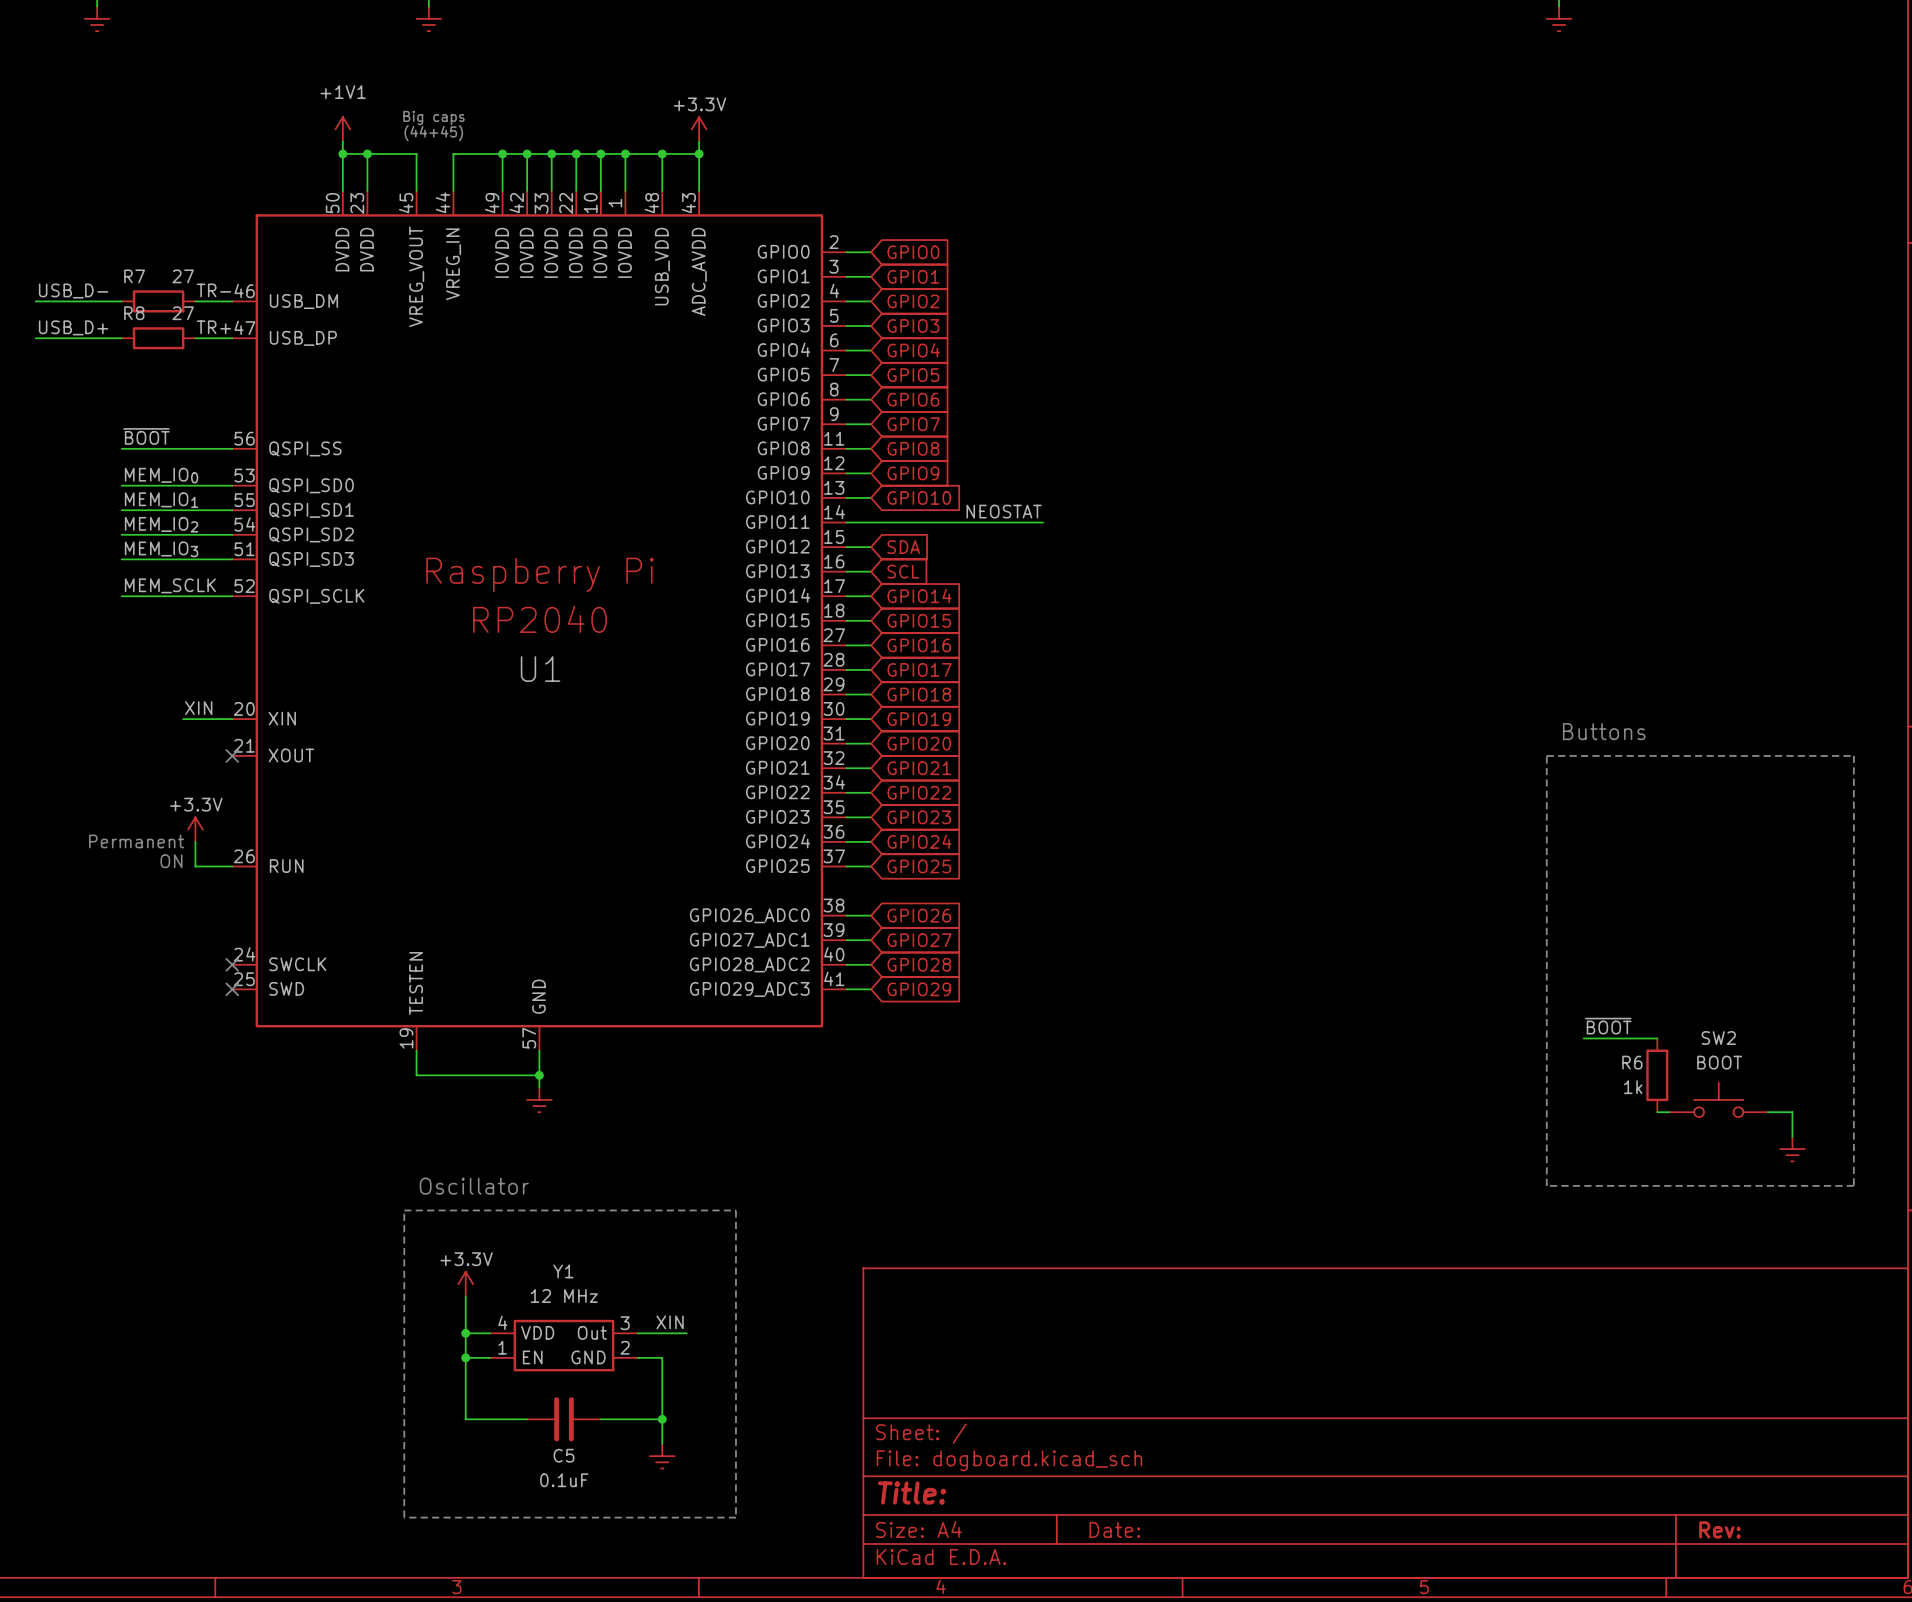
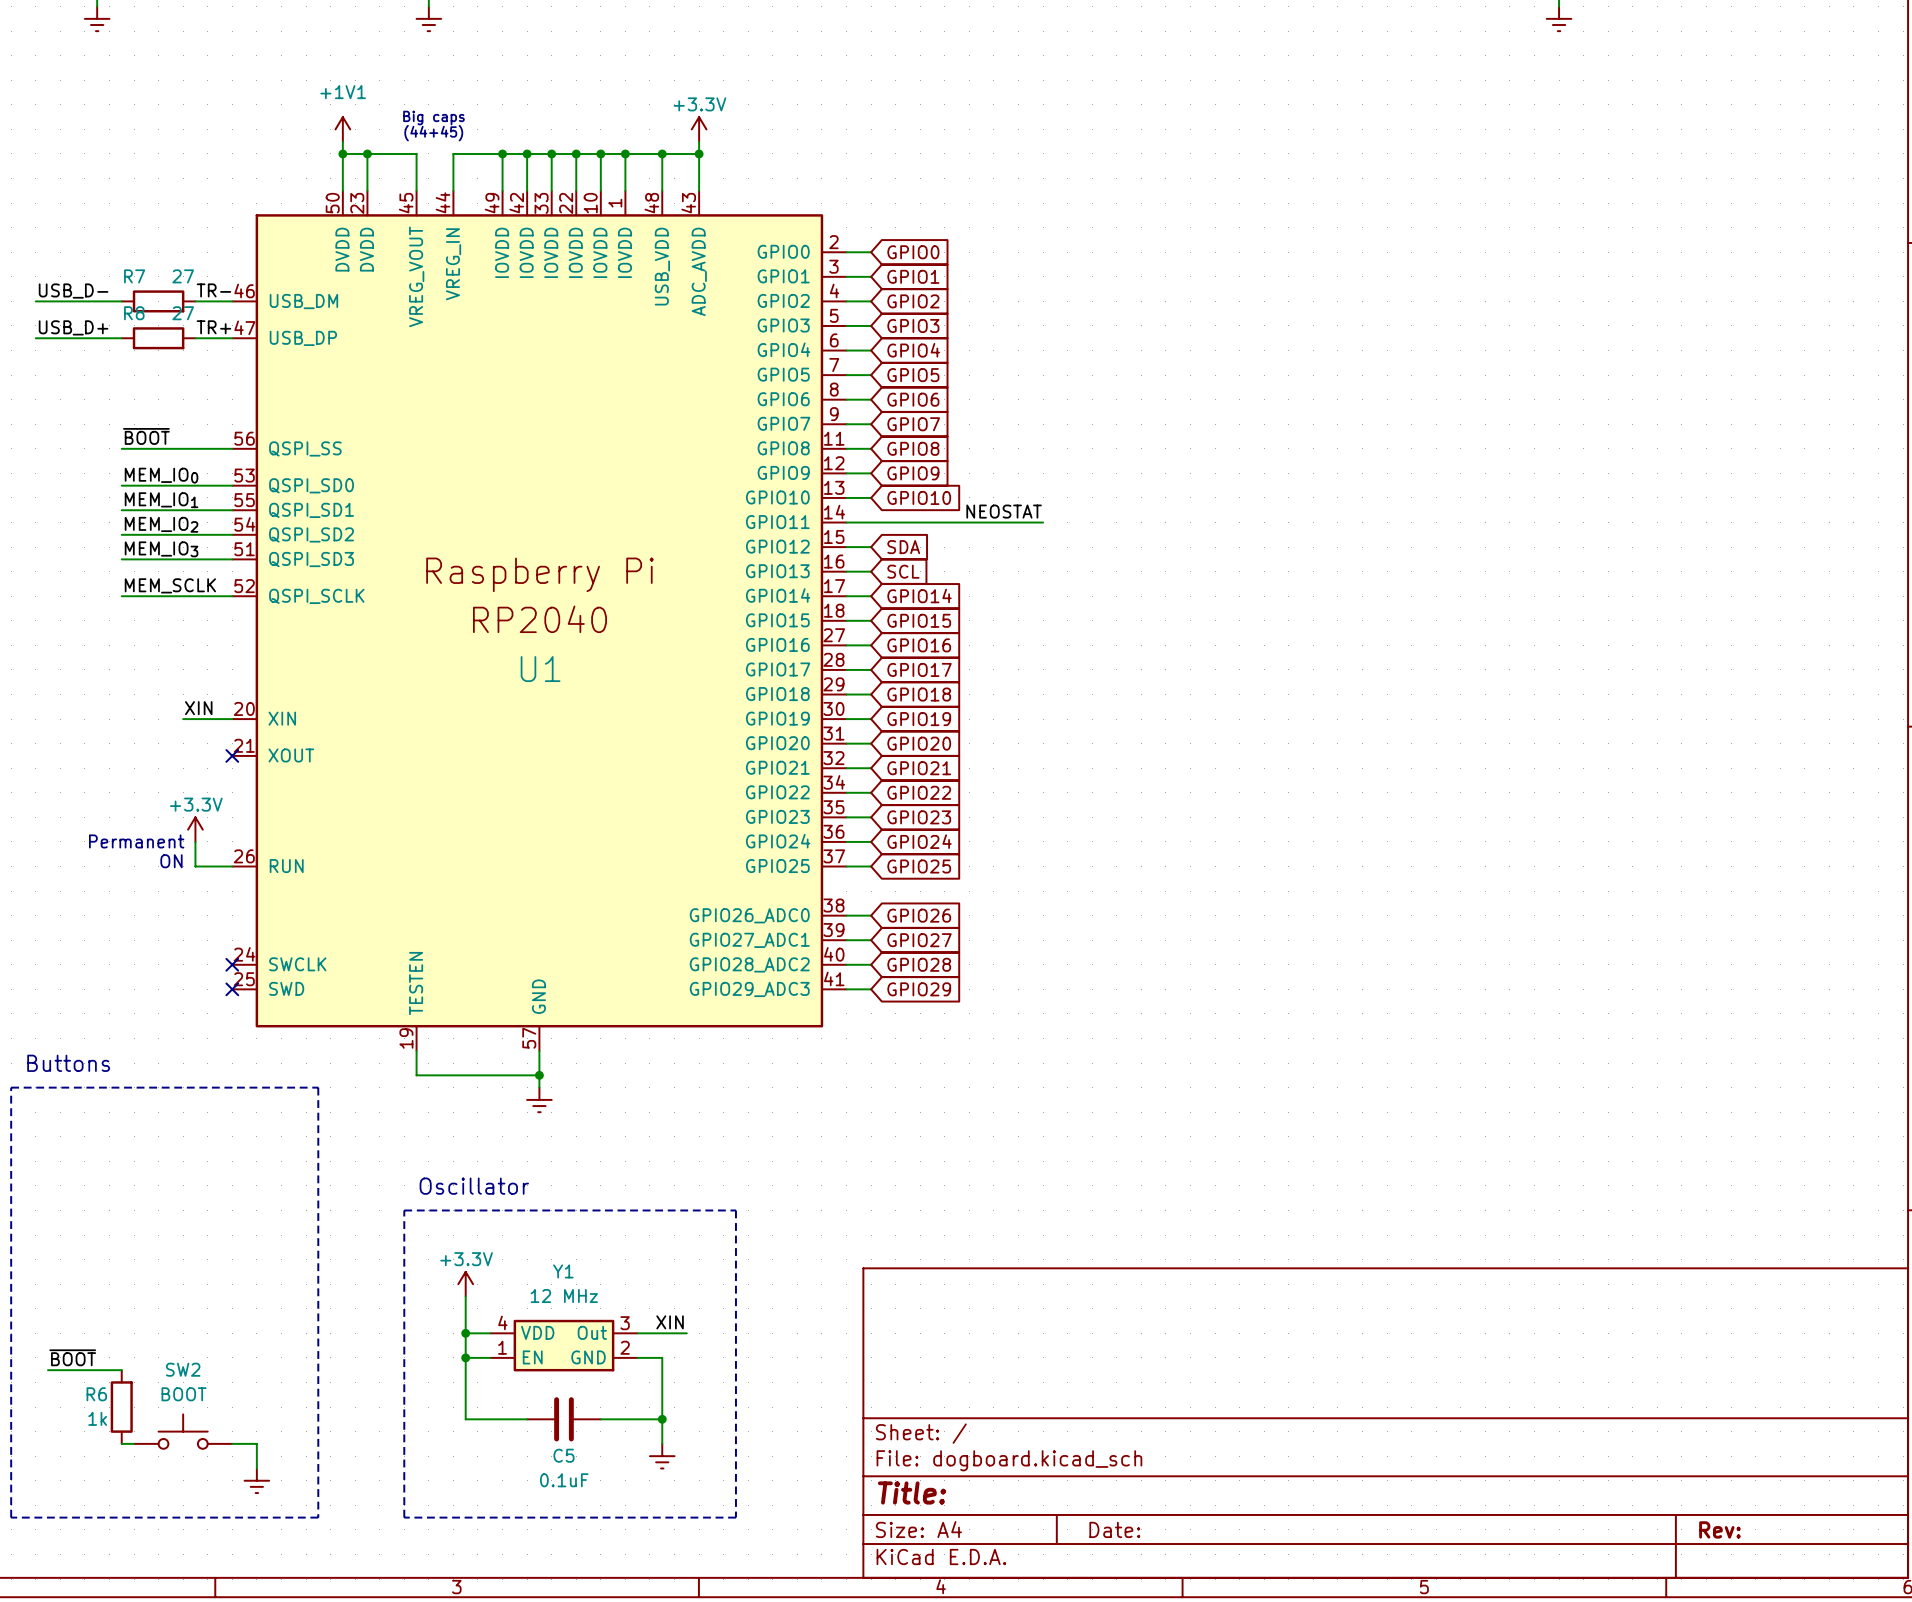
text: Buttons (1604, 731) -> none
line: (1546, 755) (1853, 755) (1853, 1185) (1546, 1185) (1546, 755) -> none
label: ~{BOOT} (1608, 1026) -> none
wire: (1583, 1038) (1657, 1038) -> none
text: none -> Buttons (68, 1063)
R6 position: (1657, 1075) -> (121, 1407)
line: none -> (11, 1087) (318, 1087) (318, 1517) (11, 1517) (11, 1087)
SW2 position: (1718, 1099) -> (183, 1431)
wire: (1657, 1112) (1669, 1112) -> none
wire: (1767, 1112) (1792, 1112) (1792, 1136) -> none
power symbol: (1792, 1149) -> none
label: none -> ~{BOOT} (72, 1357)
wire: none -> (48, 1370) (121, 1370)
wire: none -> (121, 1443) (134, 1443)
wire: none -> (232, 1443) (256, 1443) (256, 1468)
power symbol: none -> (256, 1480)

